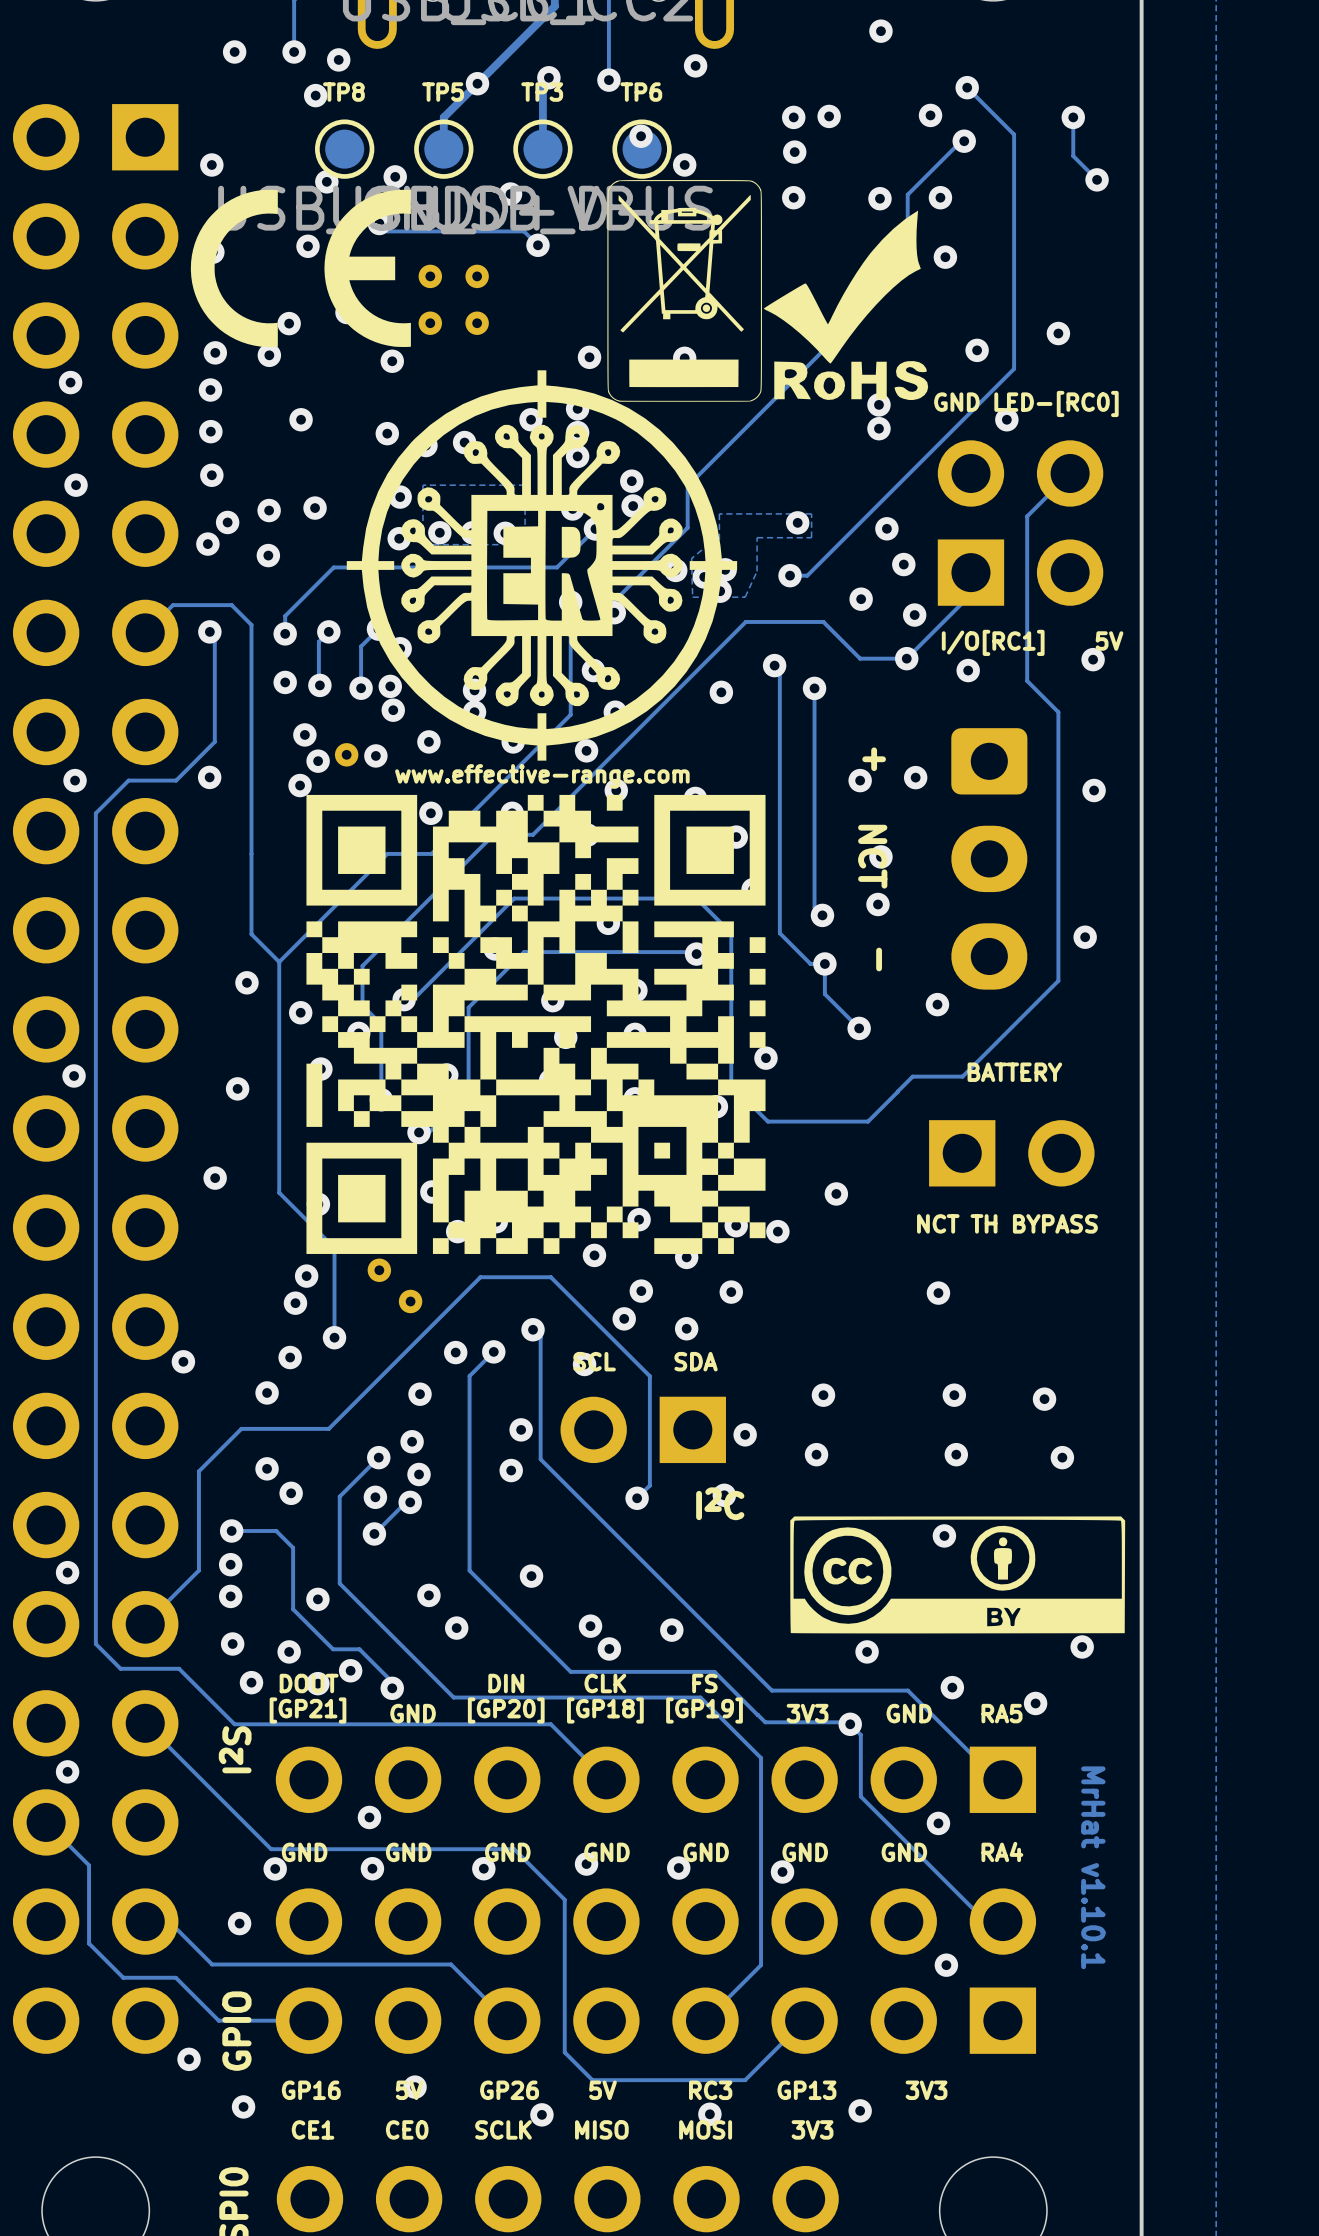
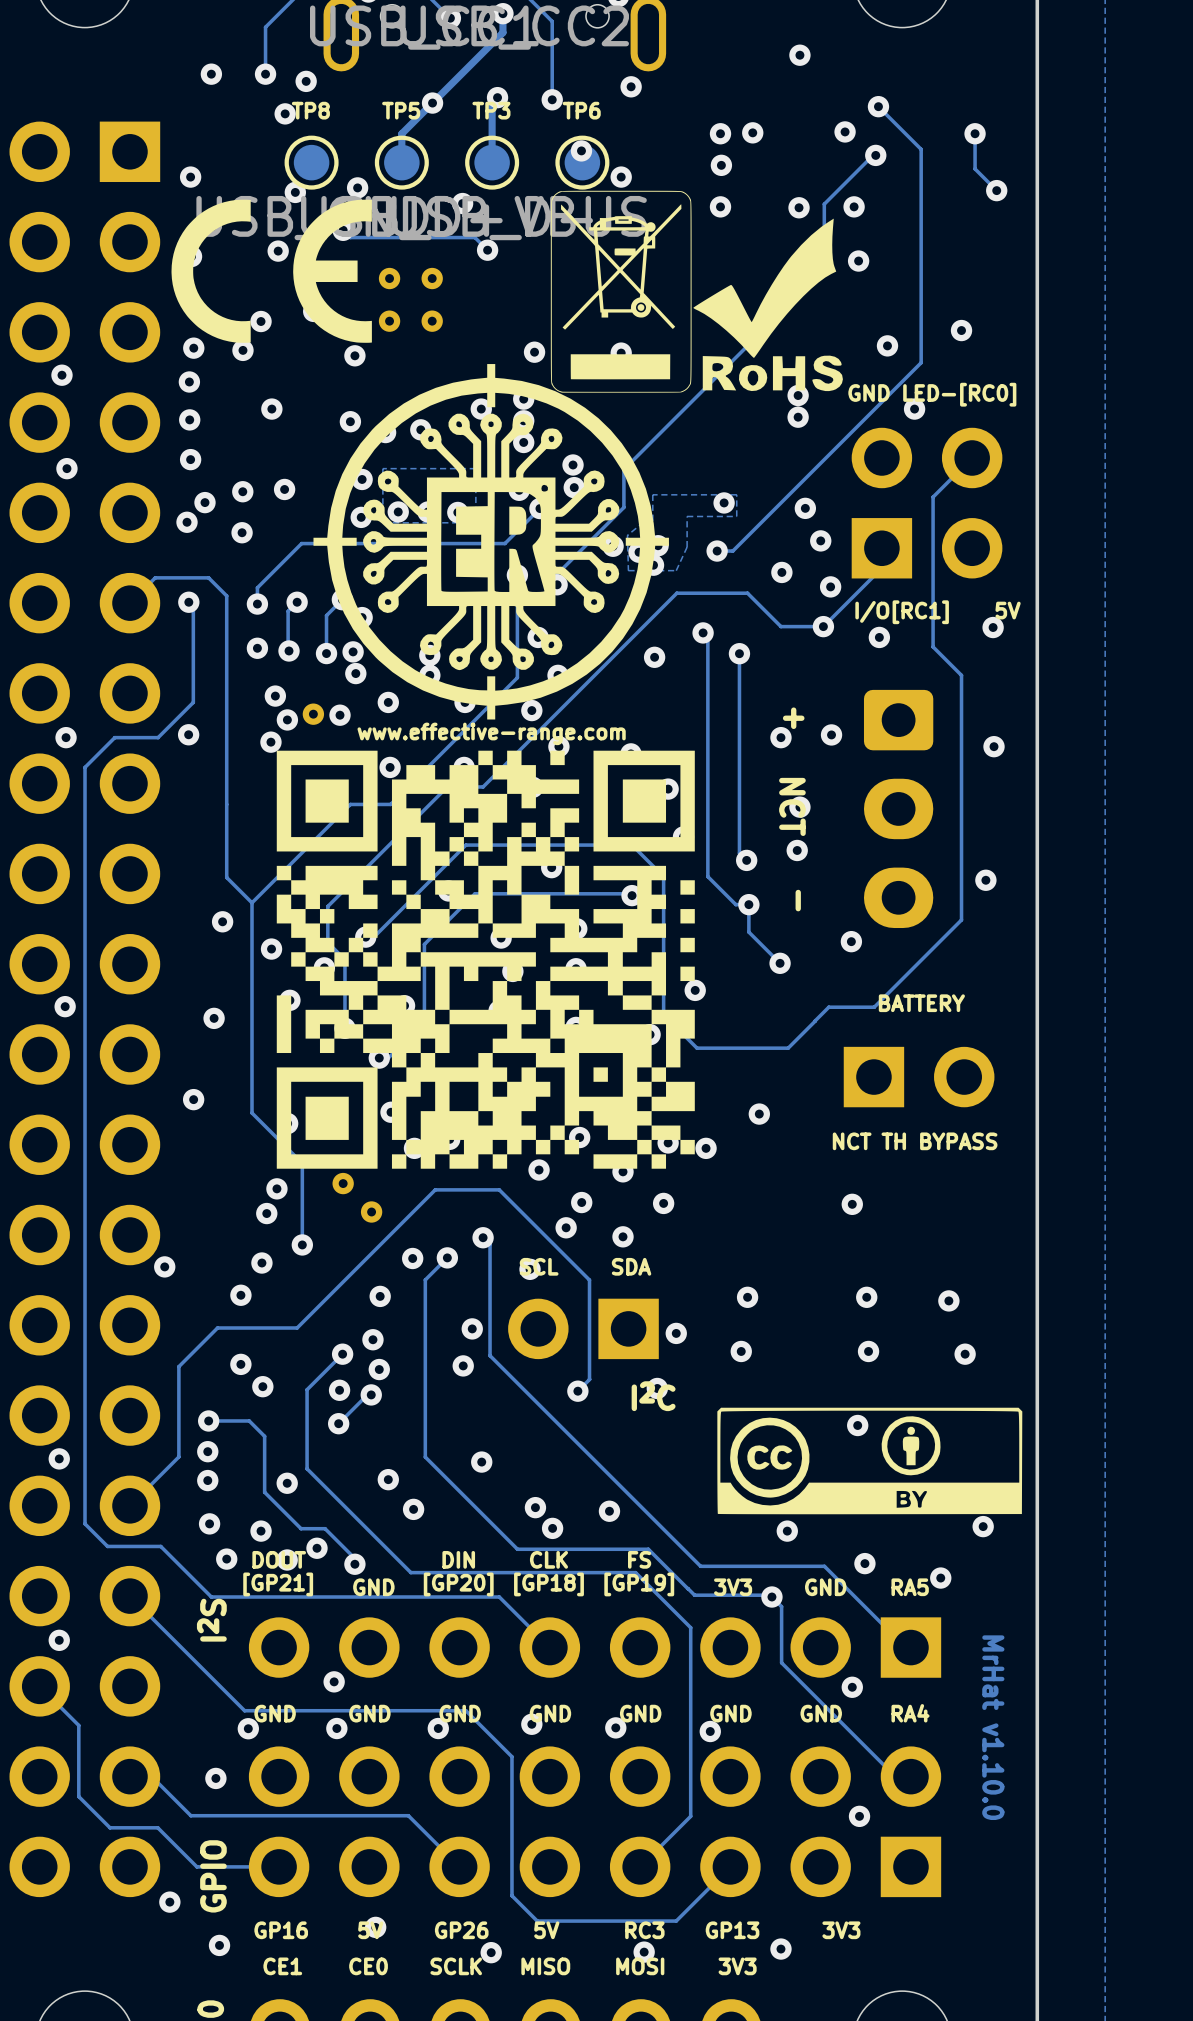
text: MrHat v1.10.1 (1093, 1867) -> MrHat v1.10.0 (993, 1727)

